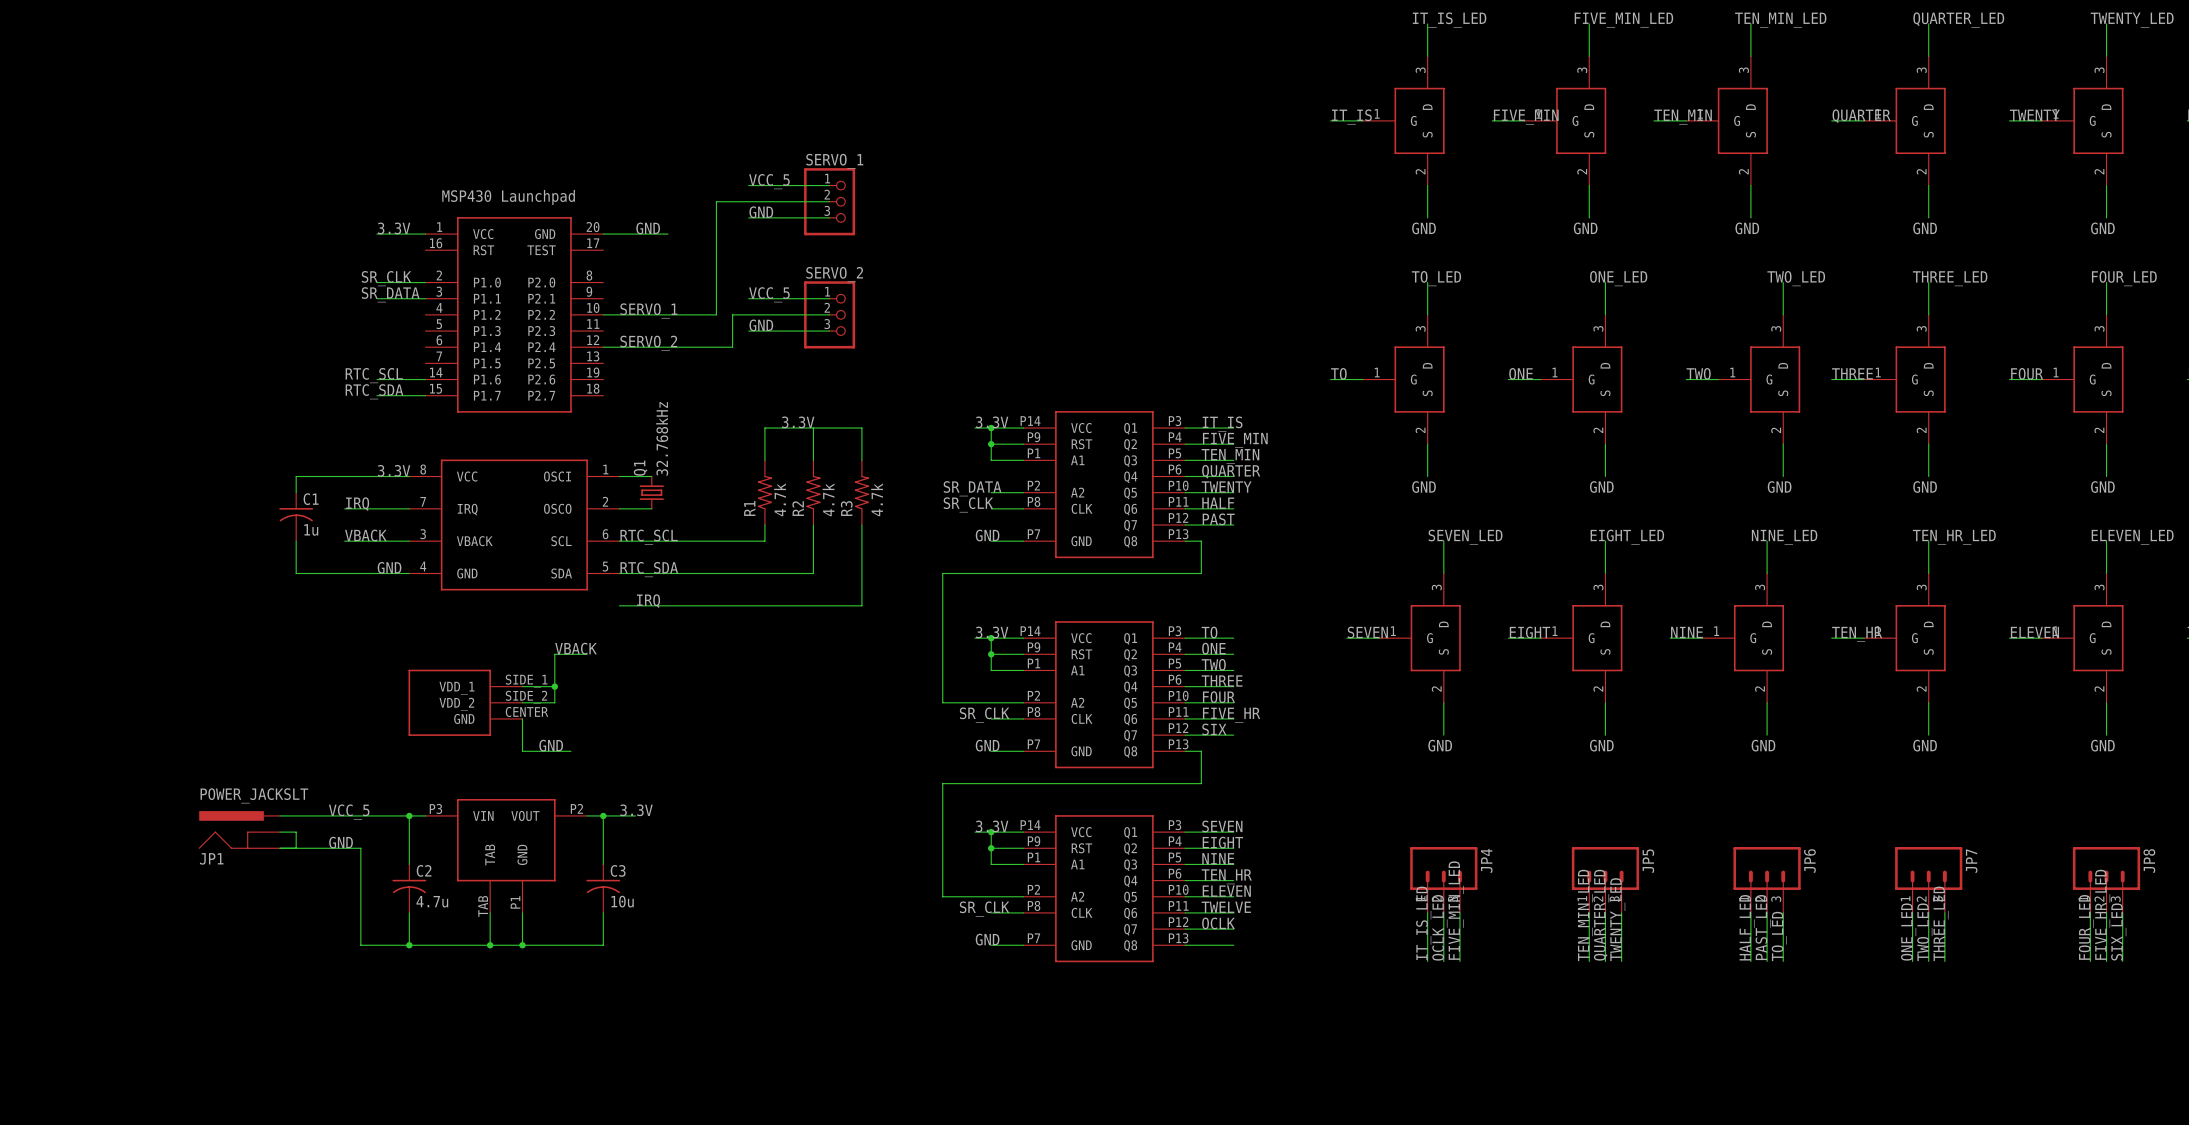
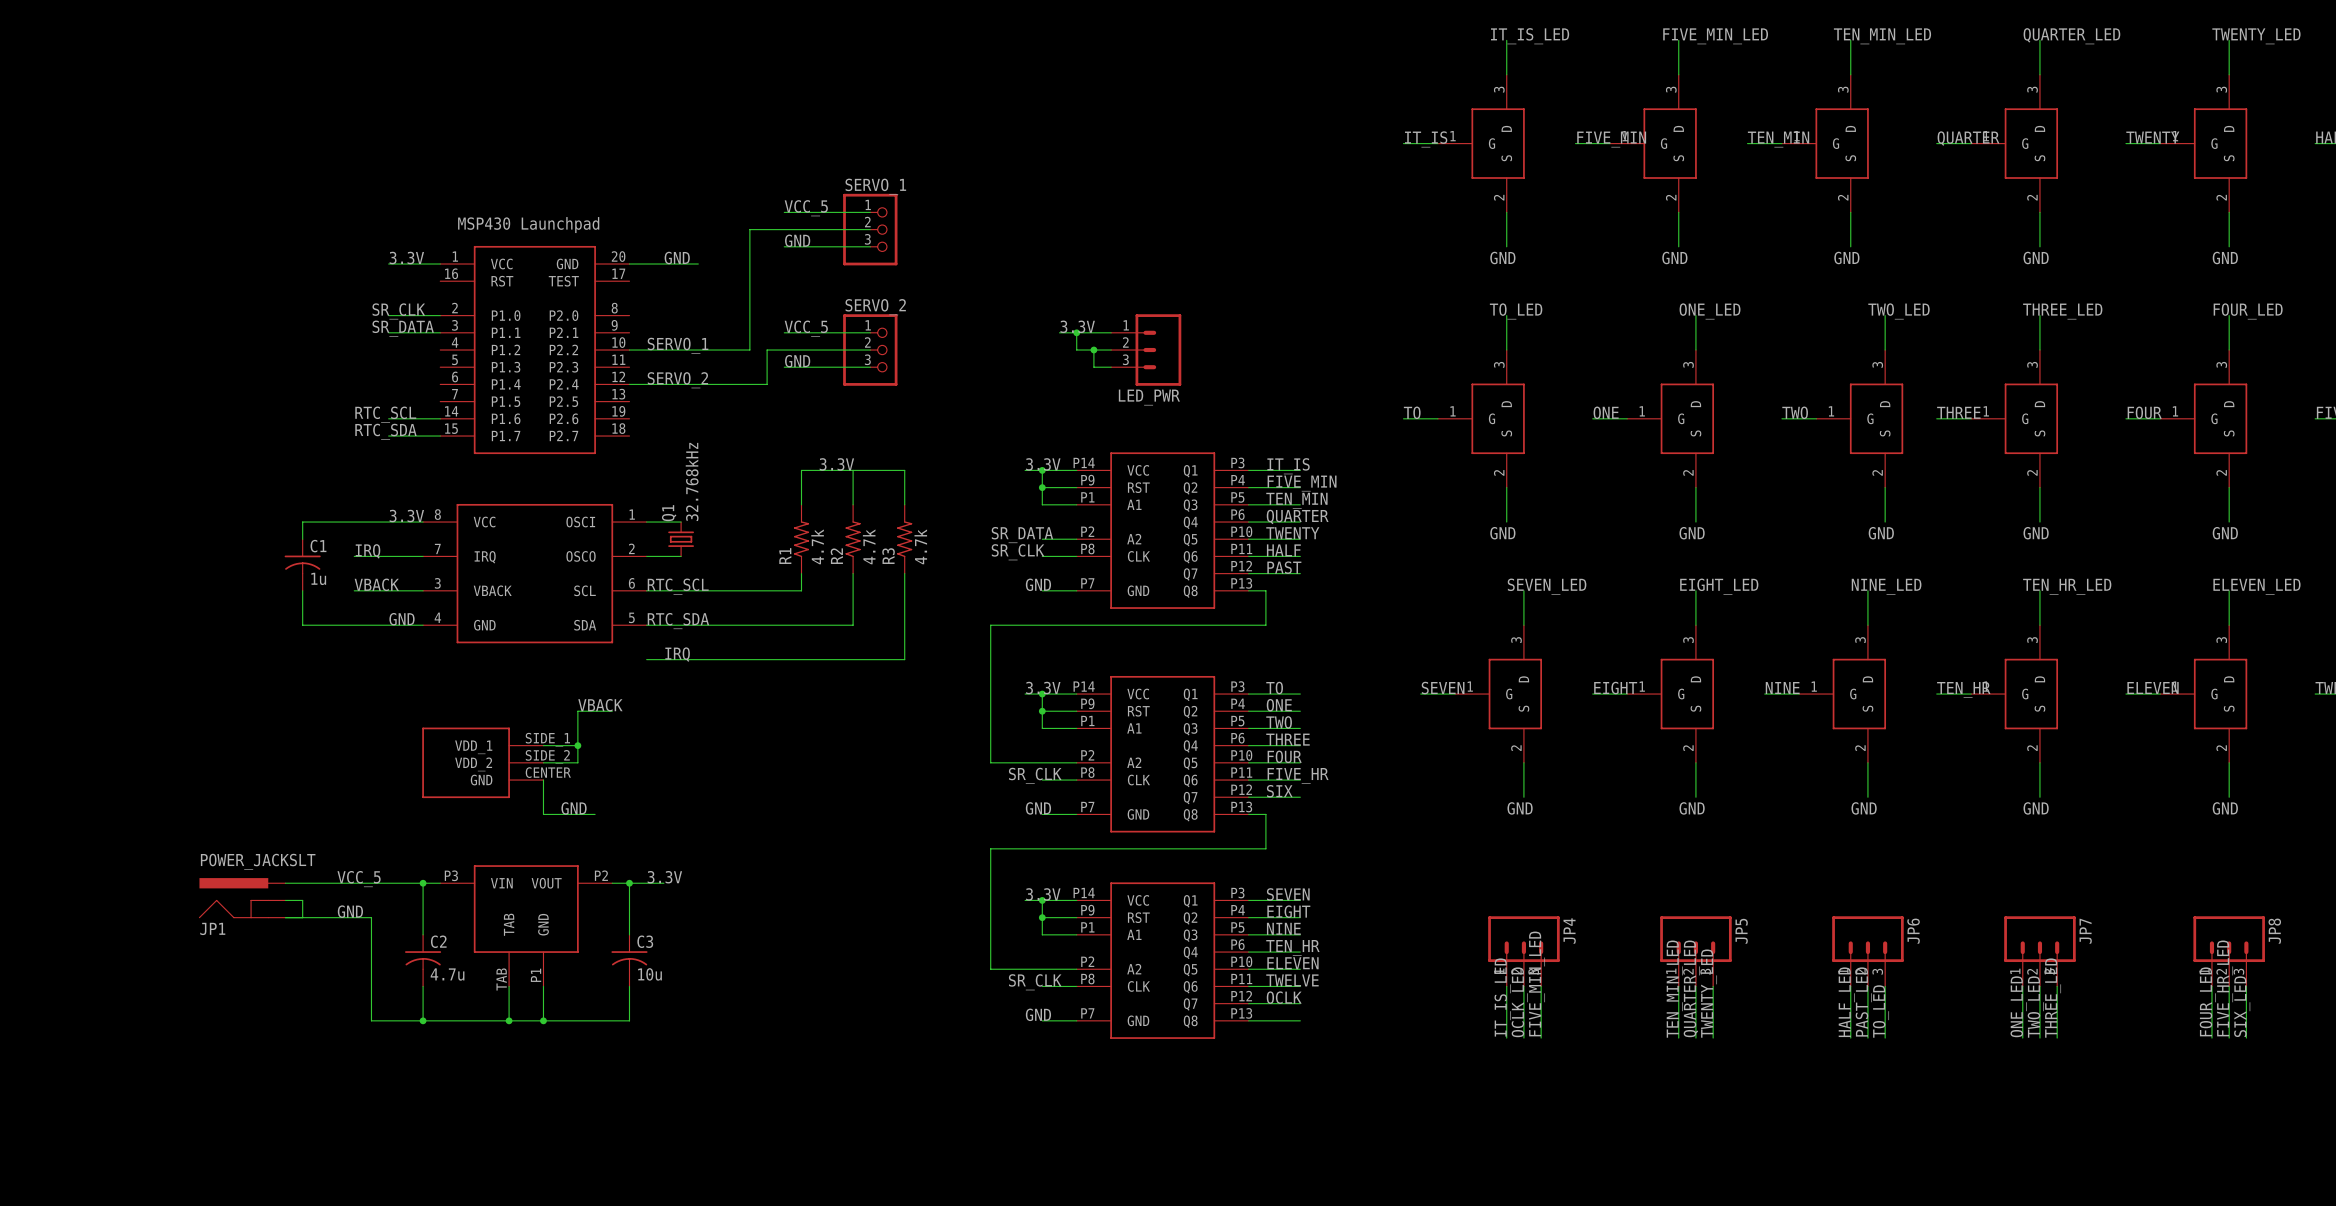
label: none -> 3.3V (1077, 326)
wire: none -> (1059, 332) (1111, 332)
wire: none -> (1076, 332) (1076, 350) (1111, 350)
junction: none -> (1076, 332)
wire: none -> (1093, 350) (1093, 367) (1111, 367)
junction: none -> (1093, 350)
LED_PWR: none -> (1146, 350)

